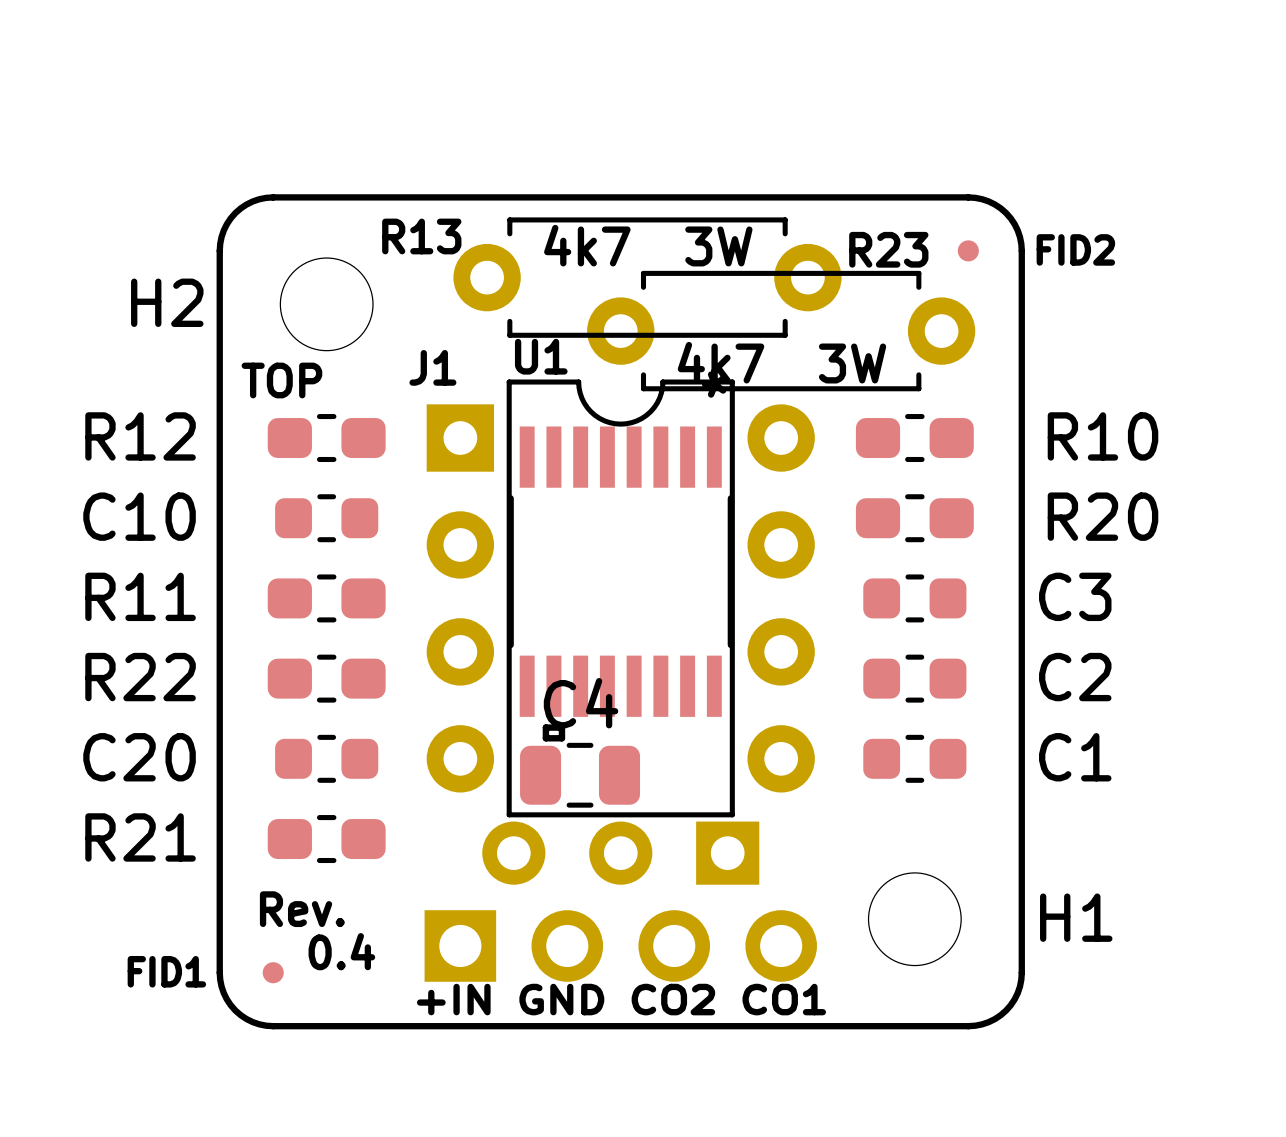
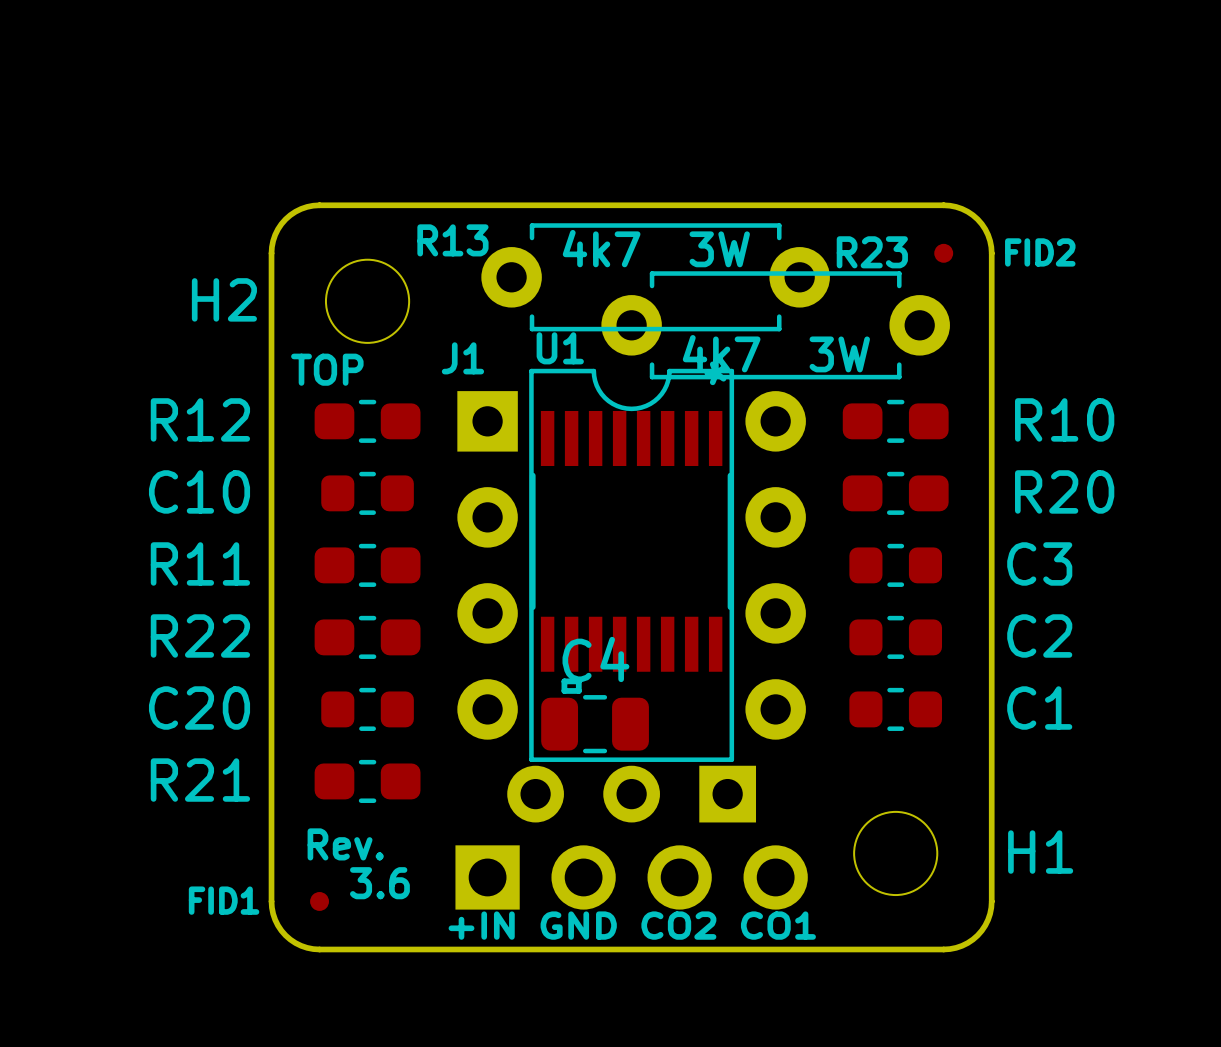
text: 0.4 (341, 951) -> 3.6 (379, 883)

